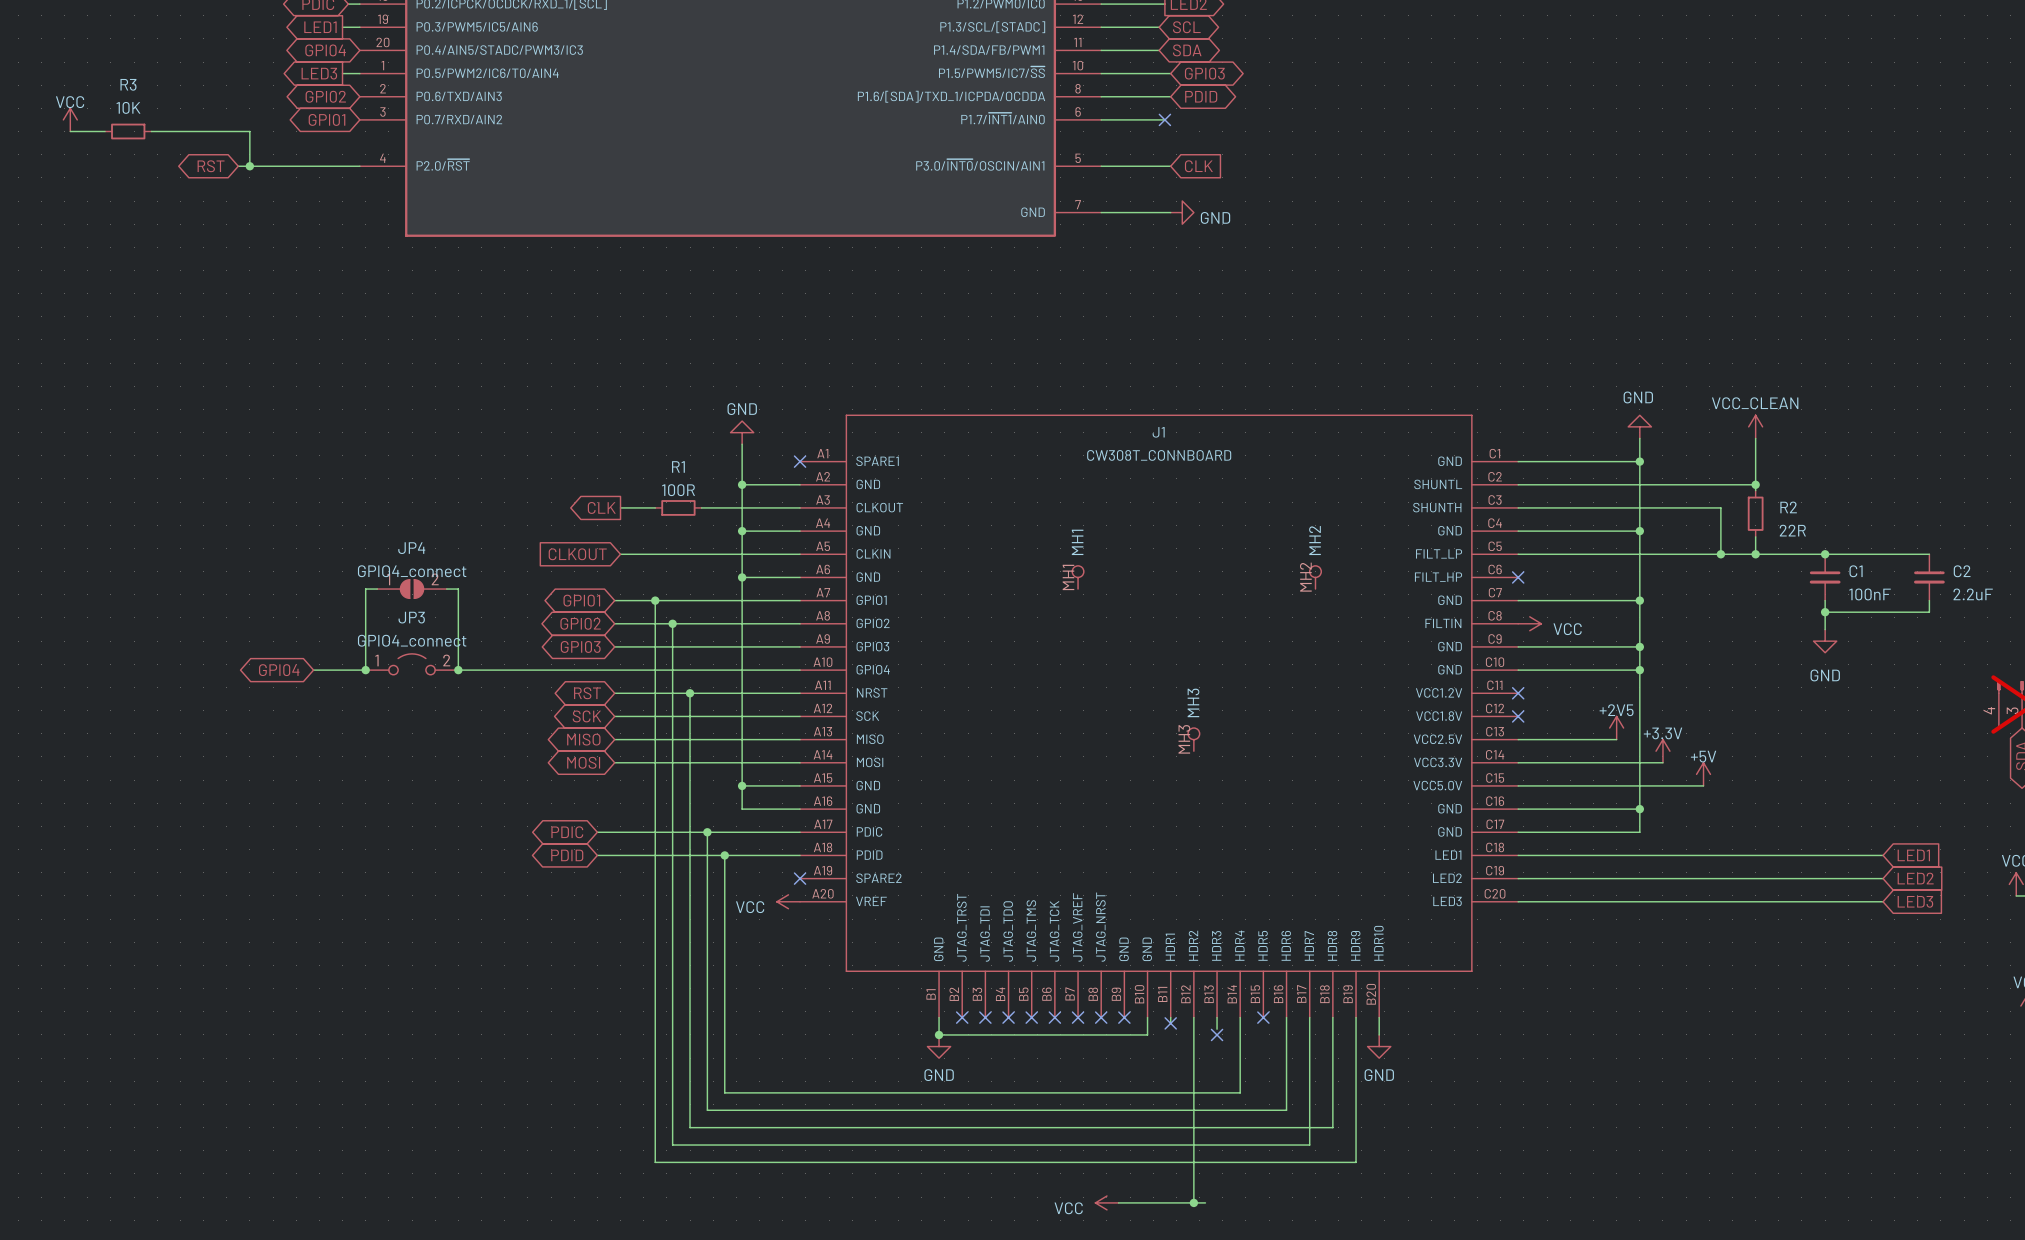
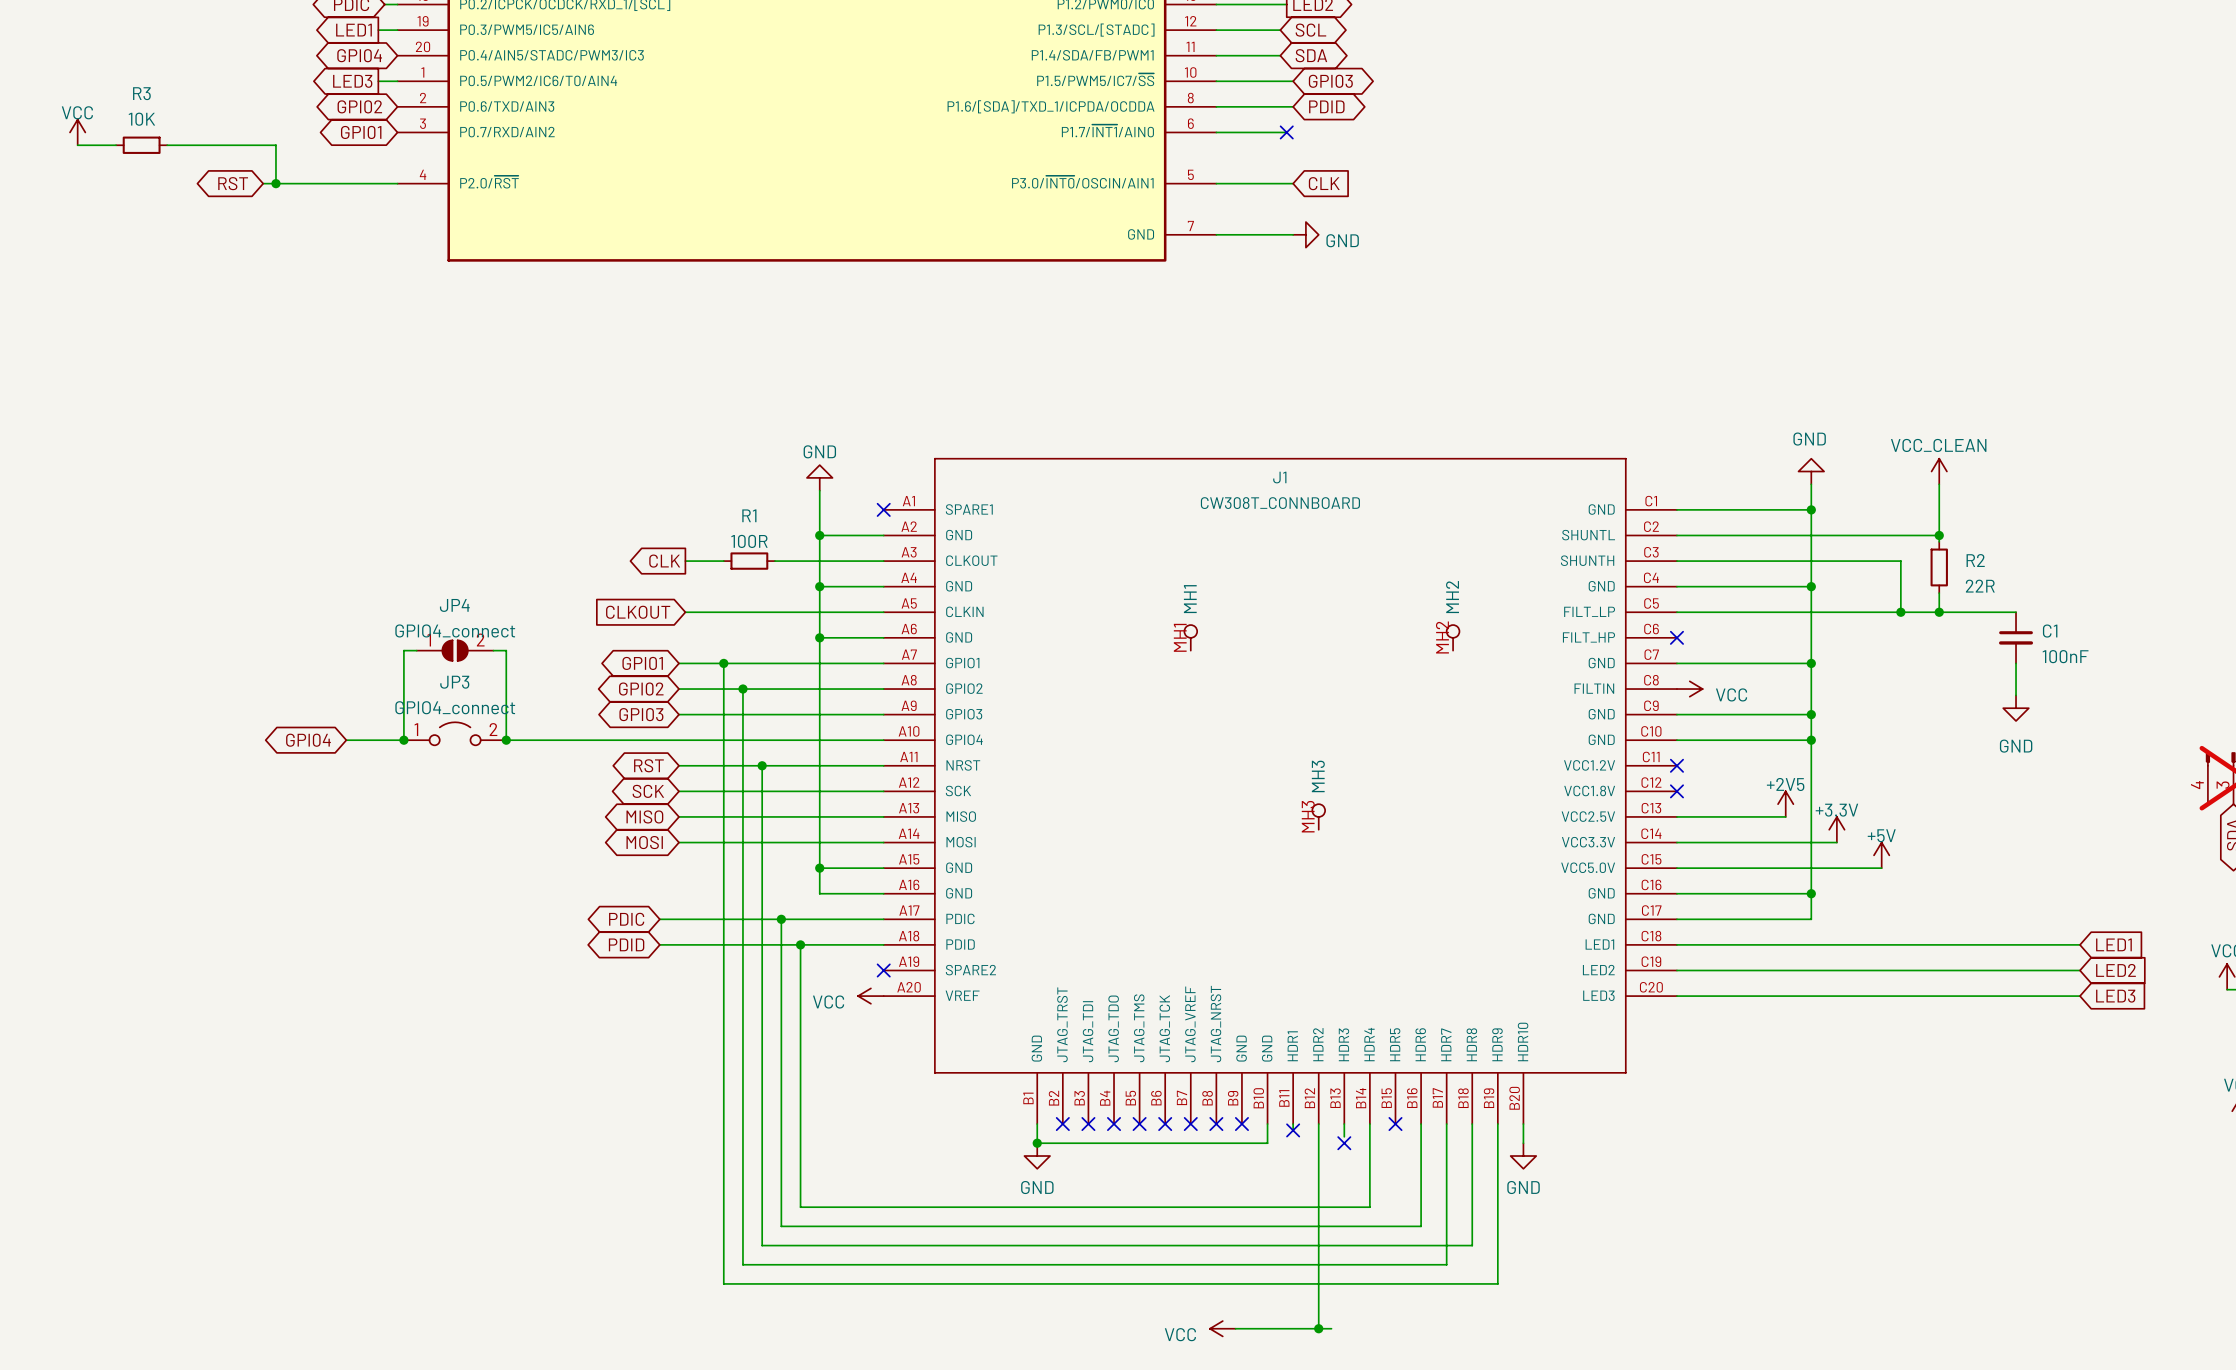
wire: (1825, 554) (1929, 554) -> none
junction: (1825, 554) -> none
C2: 2.2uF (1929, 577) -> none
wire: (1929, 600) (1929, 612) (1825, 612) -> none
junction: (1825, 612) -> none

